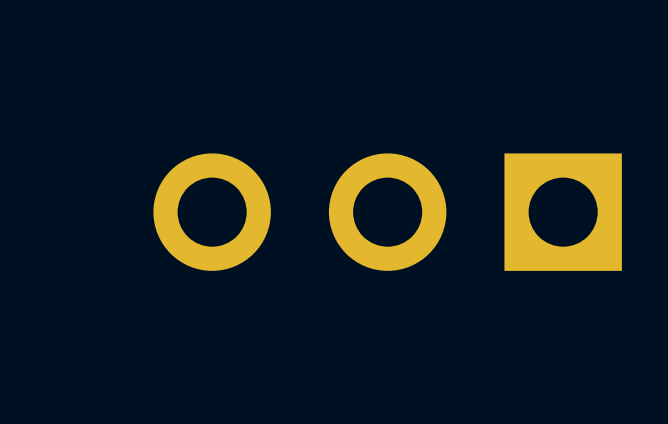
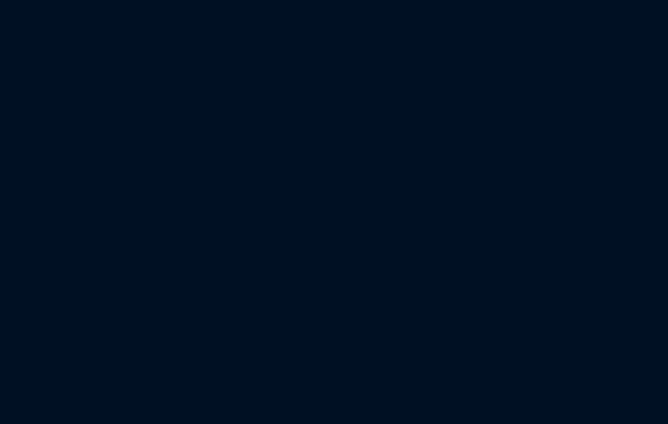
part: (387, 212) -> none

